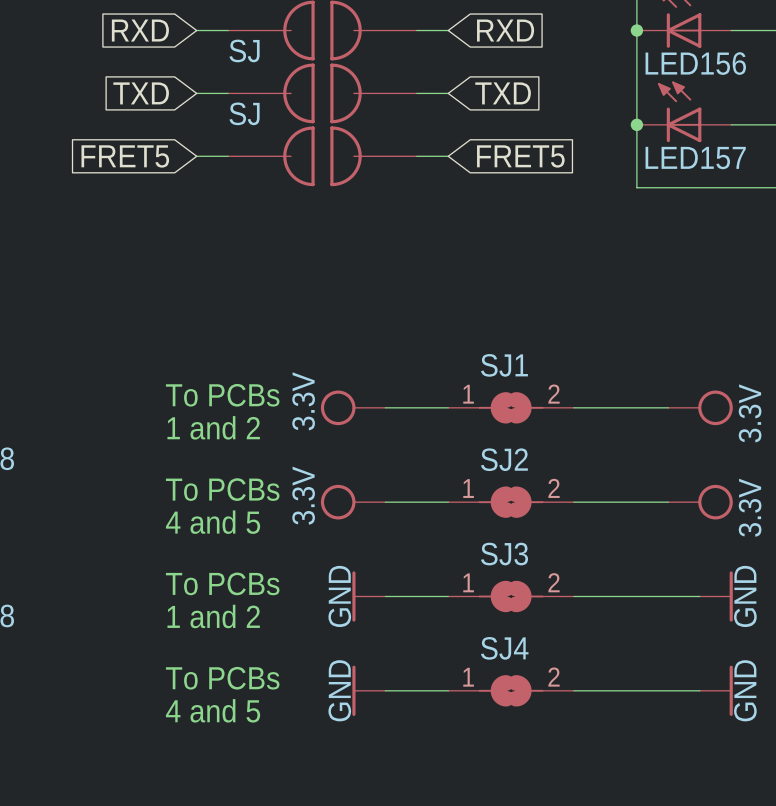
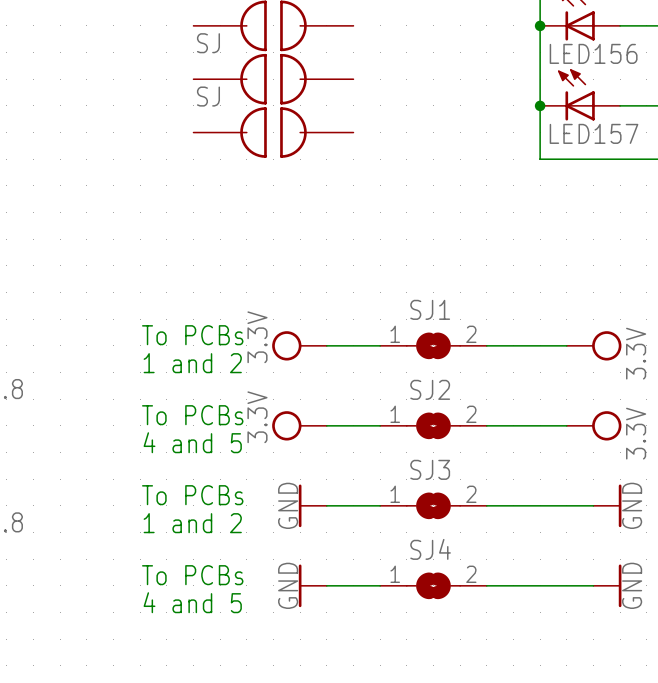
global label: RXD (140, 30) -> none
wire: (196, 30) (228, 30) -> none
wire: (416, 30) (448, 30) -> none
global label: RXD (505, 30) -> none
global label: TXD (141, 93) -> none
wire: (196, 93) (228, 93) -> none
wire: (416, 93) (448, 93) -> none
global label: TXD (503, 93) -> none
global label: FRET5 (125, 156) -> none
wire: (196, 156) (228, 156) -> none
wire: (416, 156) (448, 156) -> none
global label: FRET5 (520, 156) -> none

